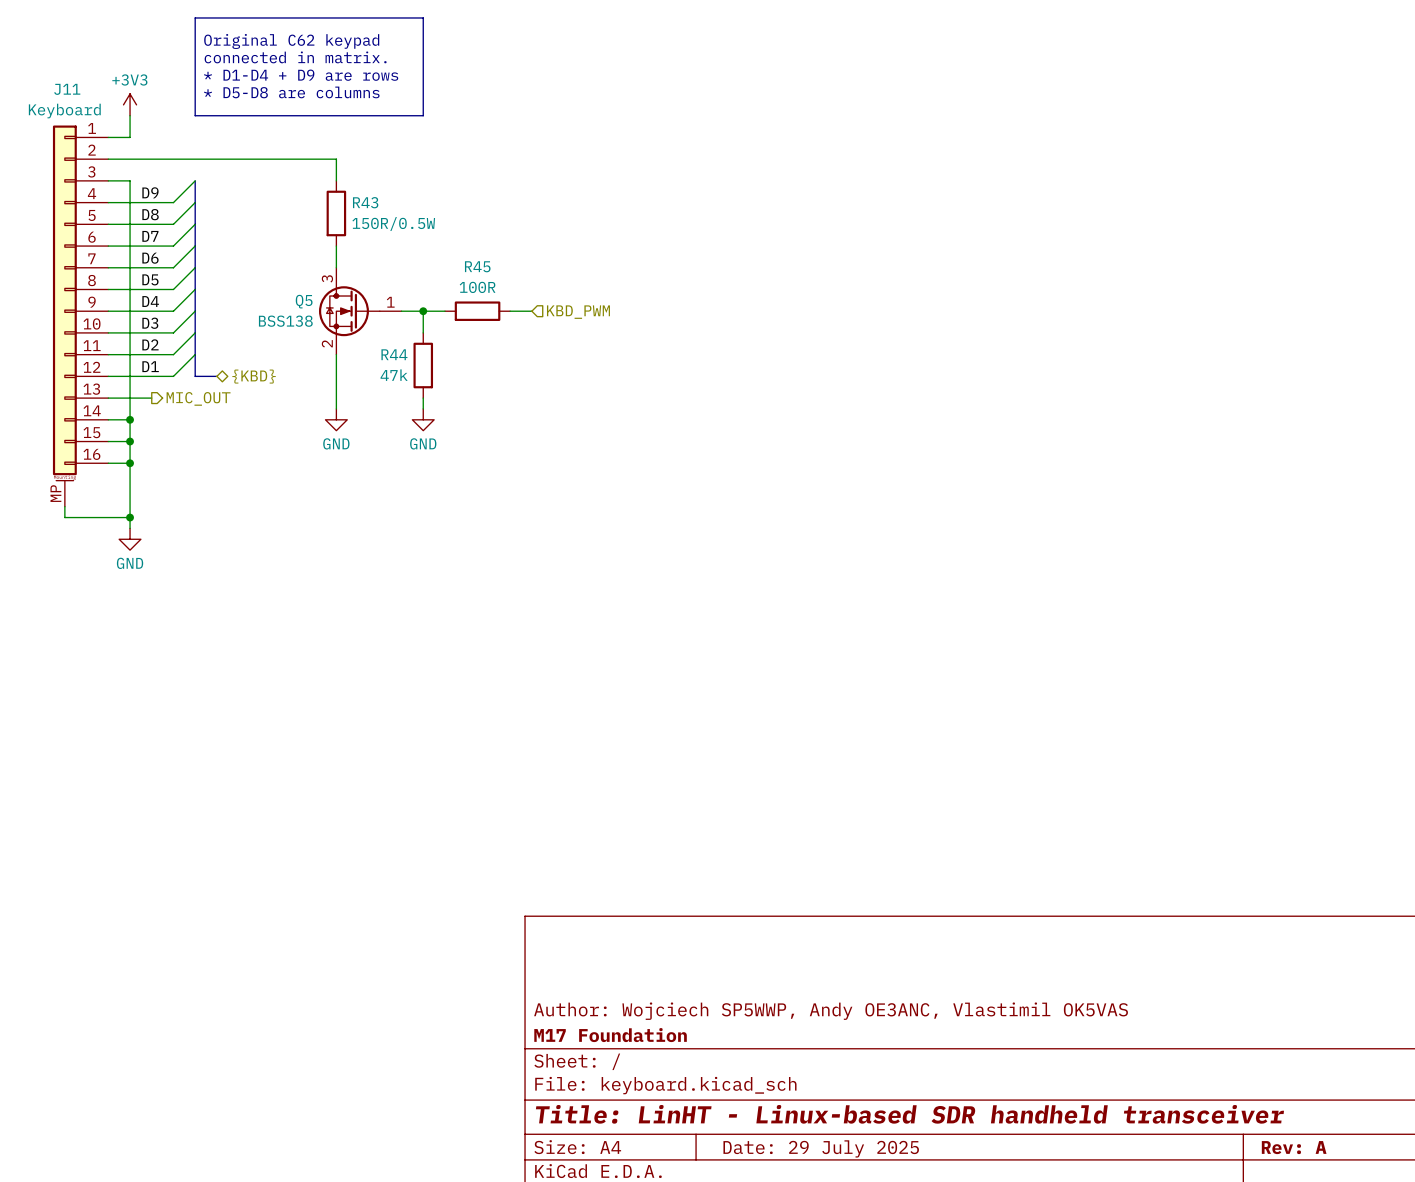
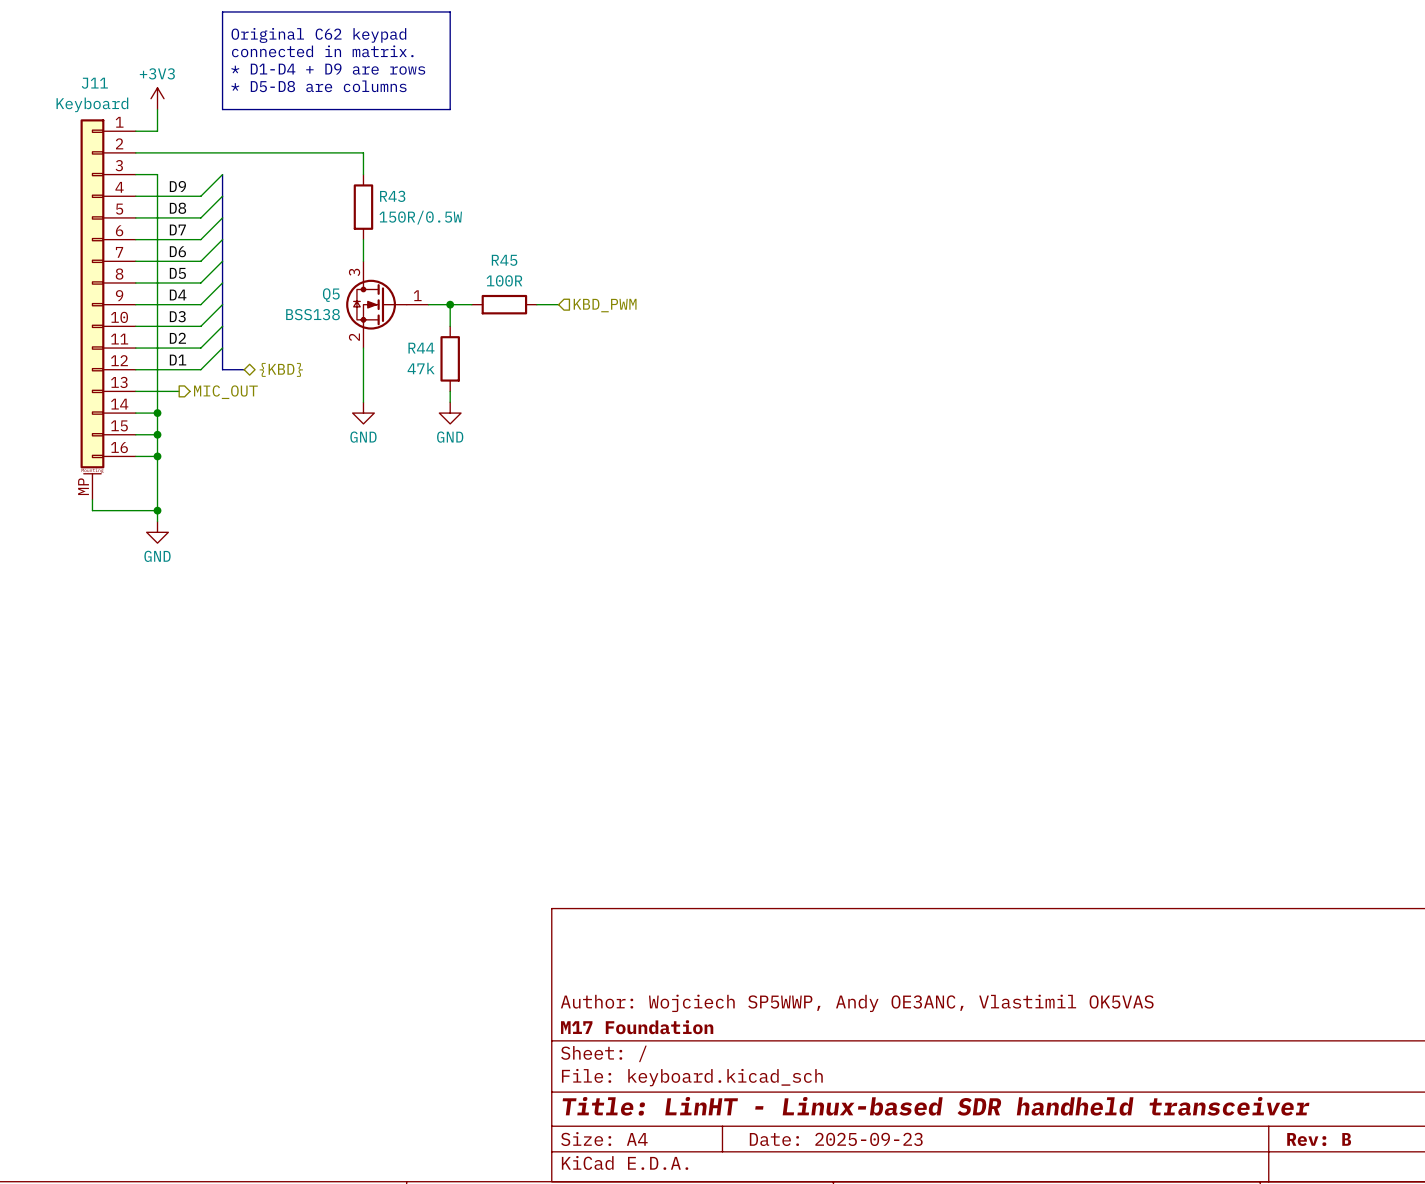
title block: Rev: A (1294, 1147) -> Rev: B (1319, 1139)
title block: Date: 29 July 2025 (821, 1148) -> Date: 2025-09-23 (836, 1139)

